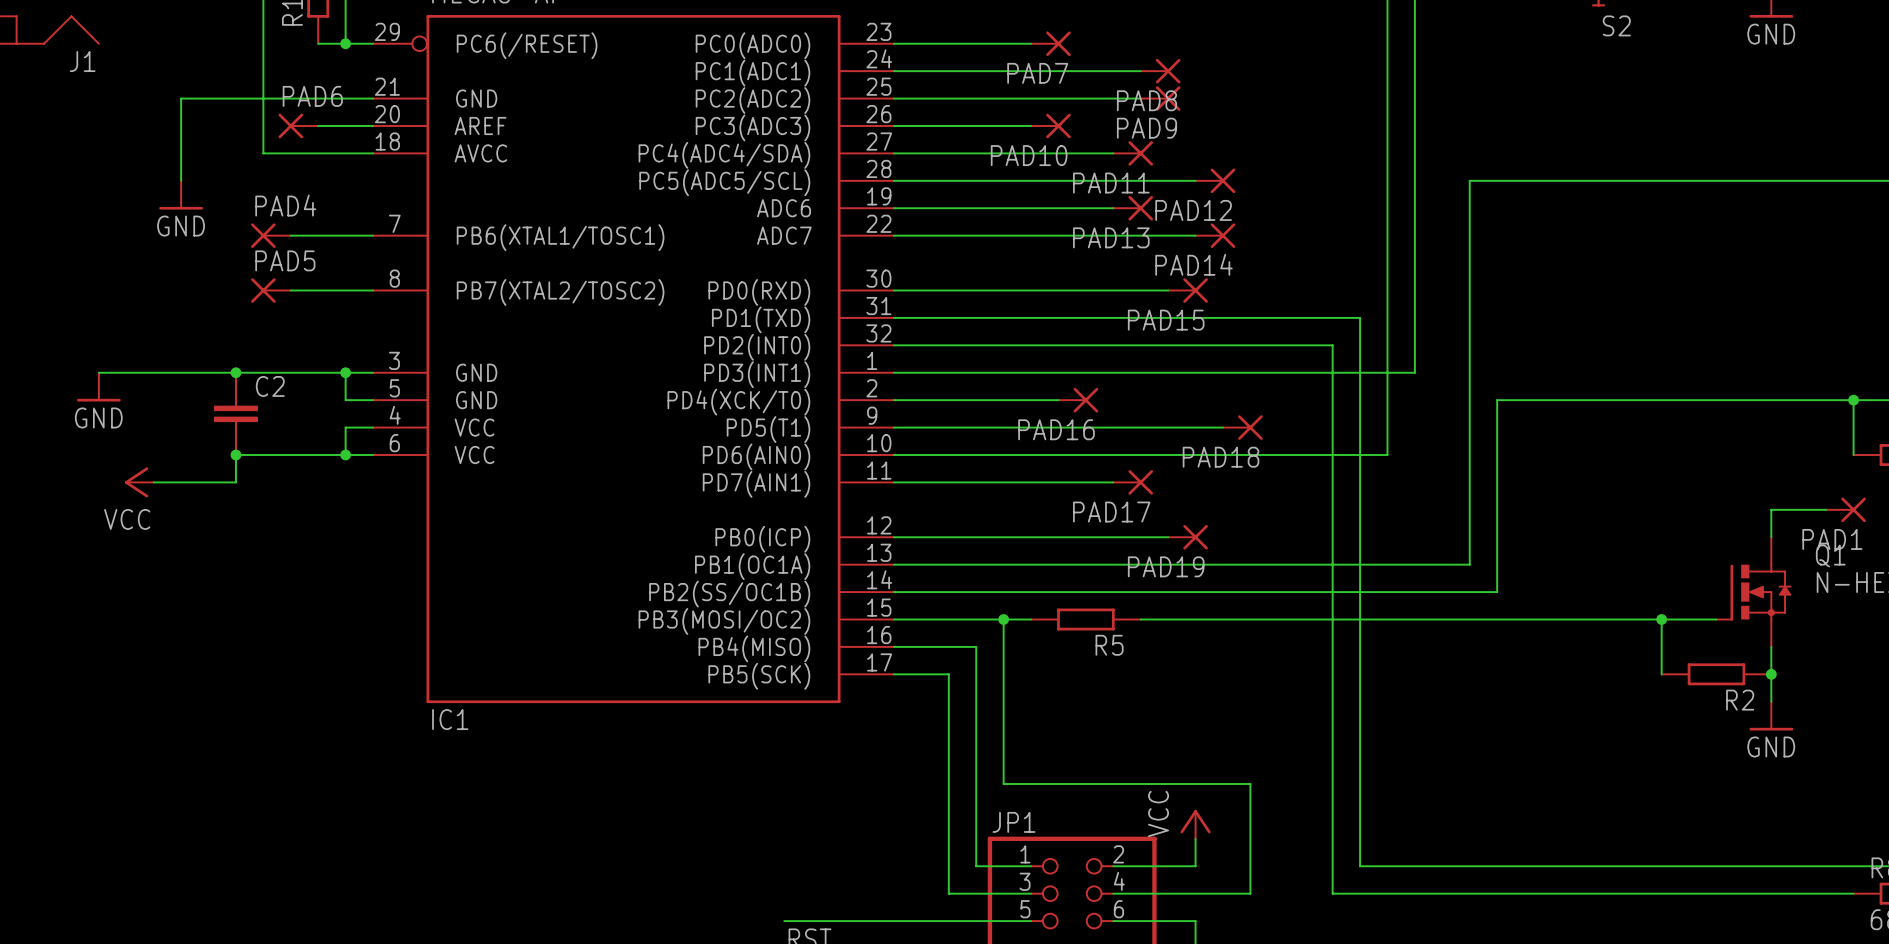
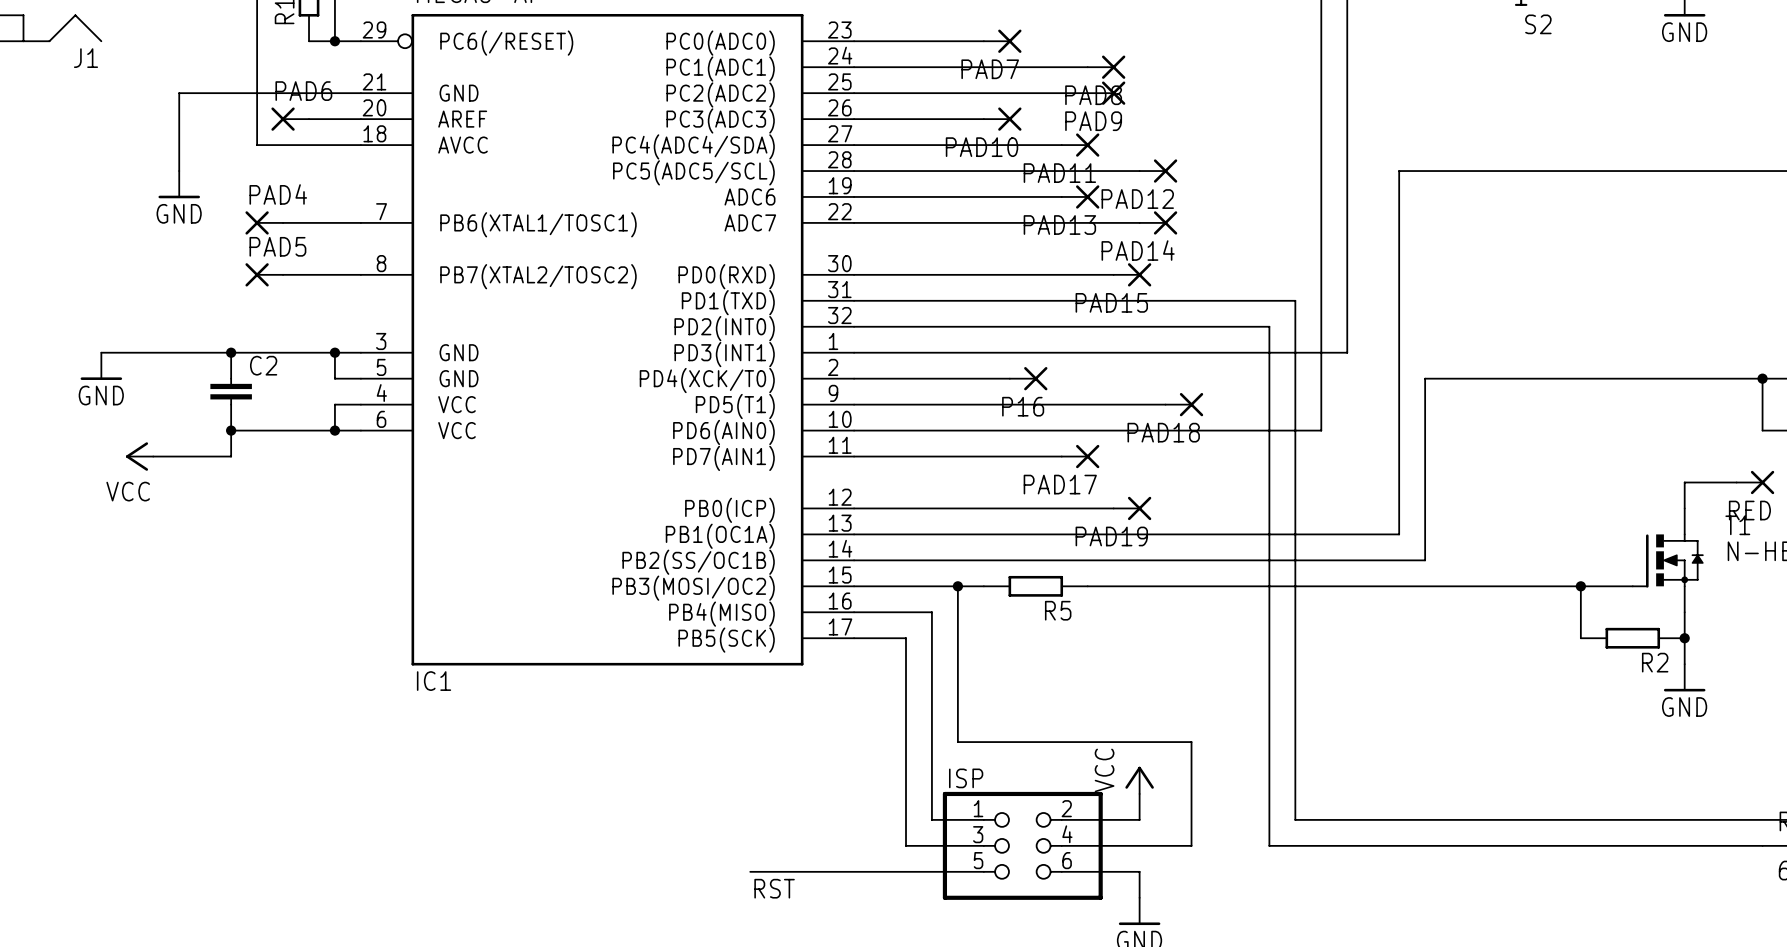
PAD16 name: PAD16 (1056, 429) -> P16 (1023, 406)
PAD1 name: PAD1 (1832, 539) -> RED (1749, 510)
Q1 name: Q1 (1830, 555) -> T1 (1737, 525)
JP1 name: JP1 (1013, 822) -> ISP (966, 778)

